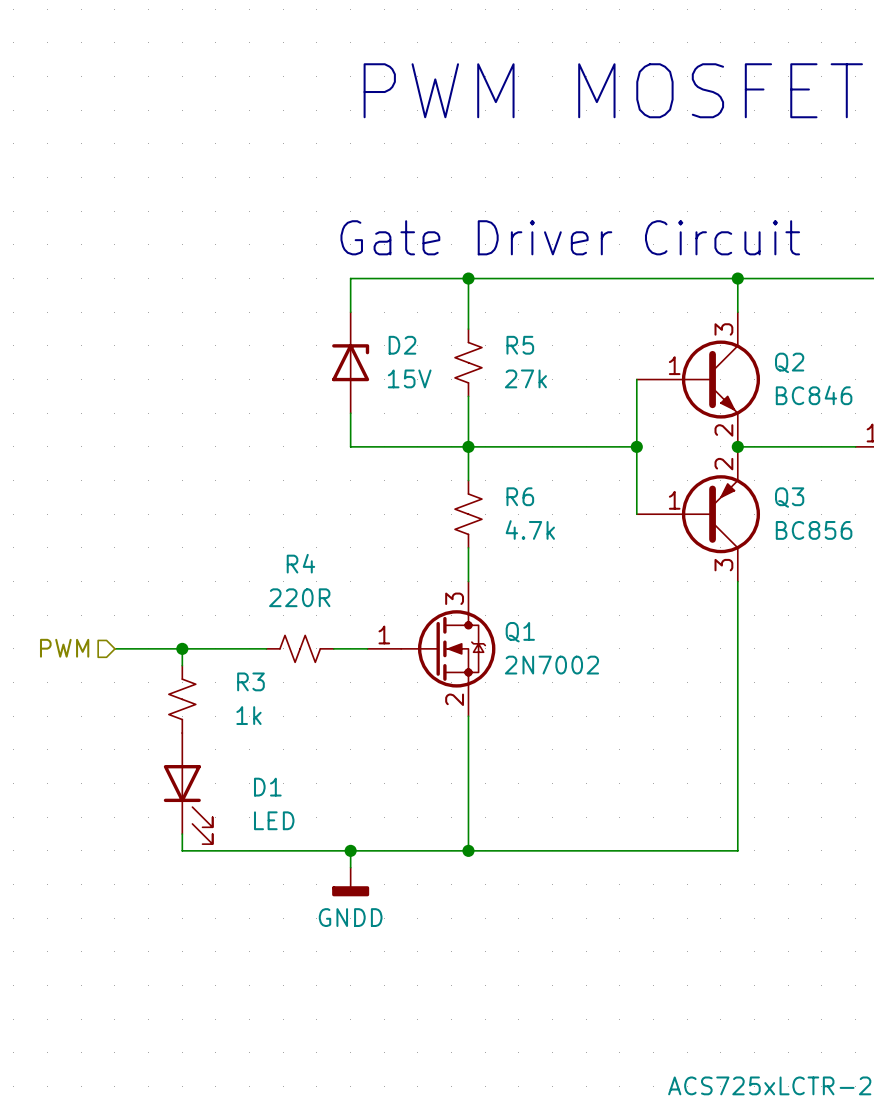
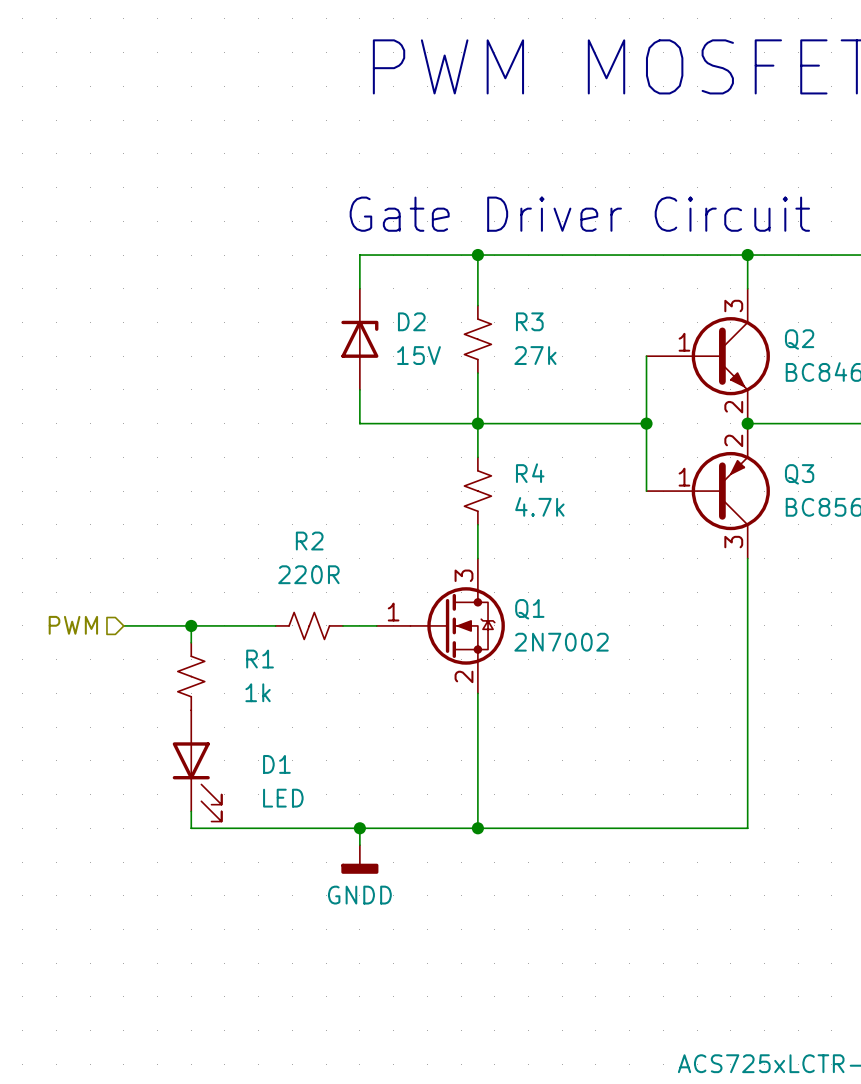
R5 name: R5 (520, 345) -> R3 (529, 321)
R6 name: R6 (520, 496) -> R4 (530, 473)
R4 name: R4 (300, 563) -> R2 (309, 541)
R3 name: R3 (250, 681) -> R1 (260, 659)

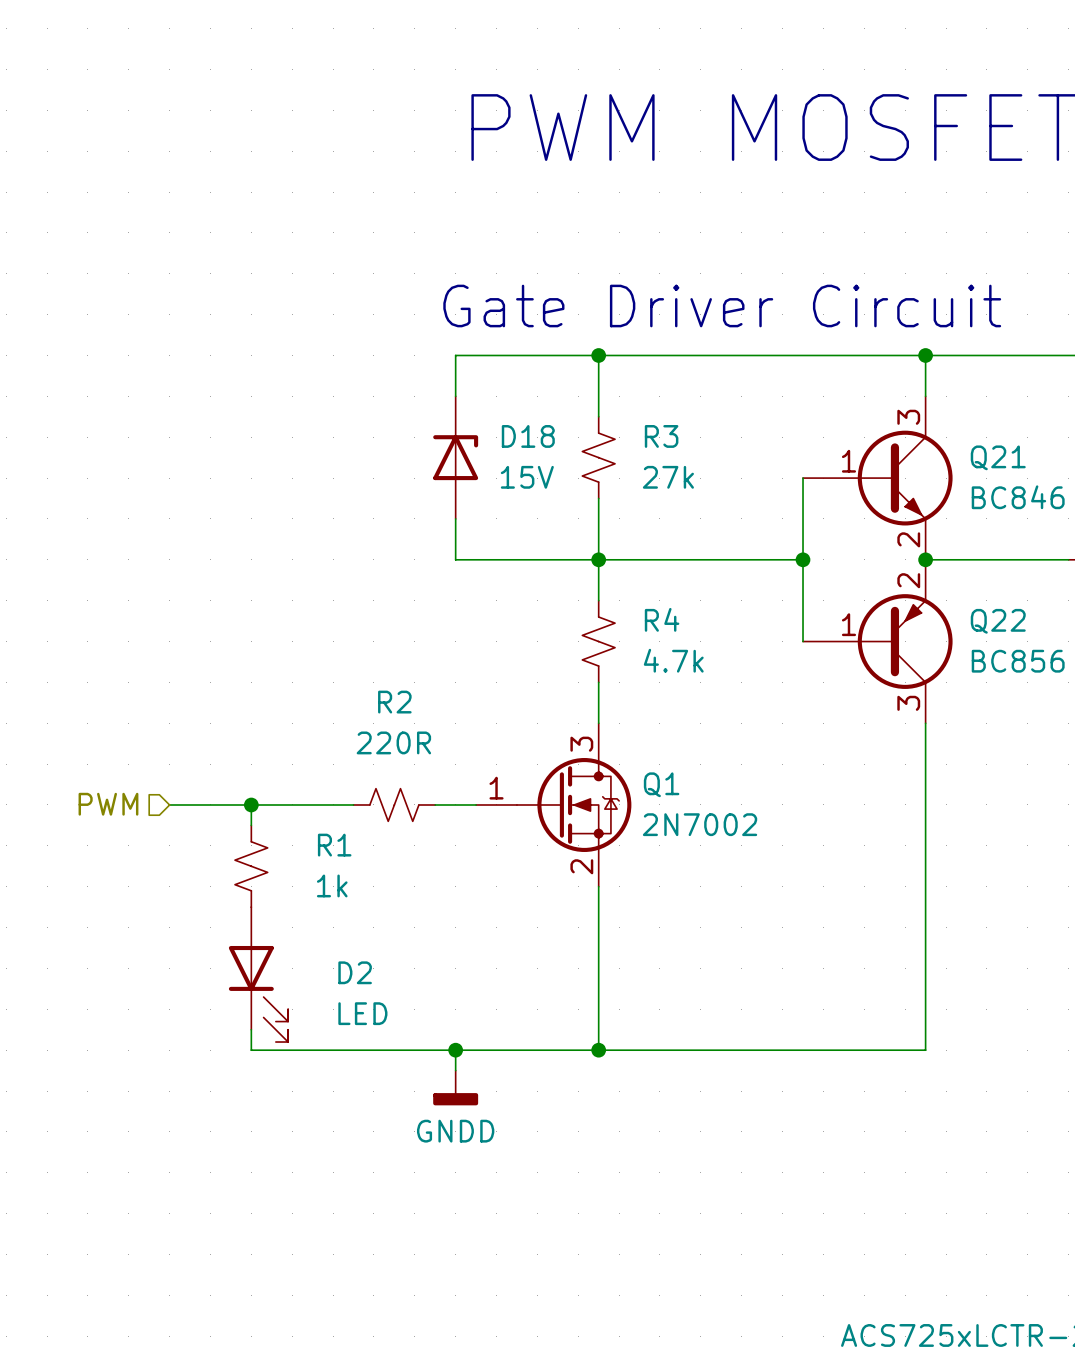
D2 name: D2 (411, 321) -> D18 (528, 436)
Q2 name: Q2 (799, 339) -> Q21 (998, 457)
Q3 name: Q3 (799, 474) -> Q22 (998, 621)
D1 name: D1 (276, 764) -> D2 (355, 972)

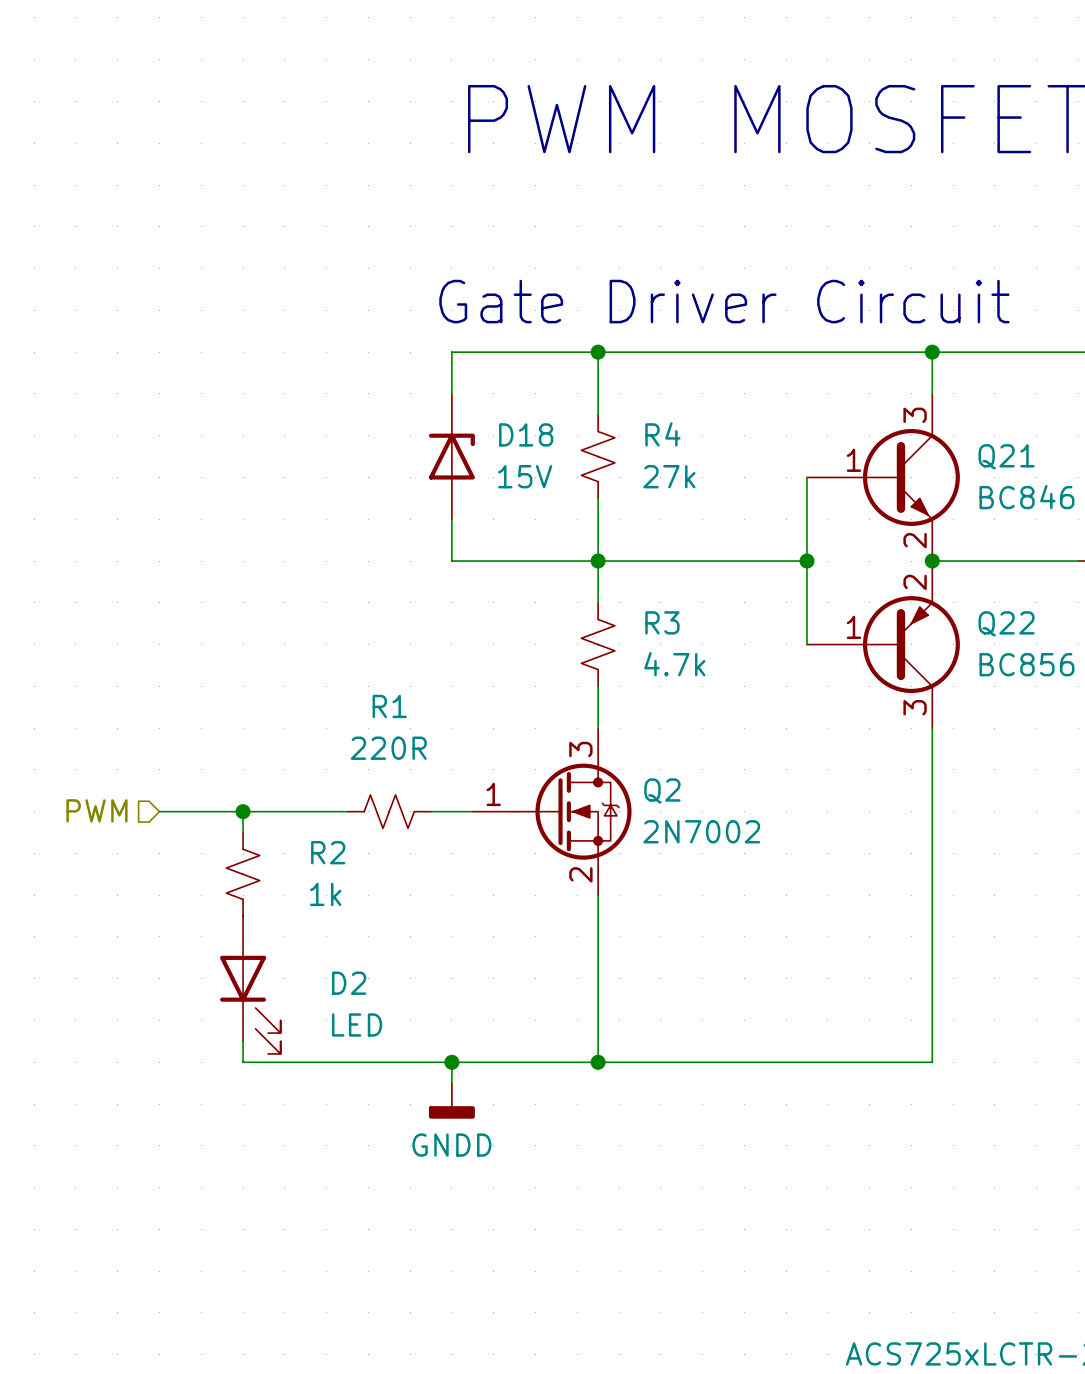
R3 name: R3 (661, 436) -> R4 (662, 434)
R4 name: R4 (662, 619) -> R3 (662, 622)
R2 name: R2 (394, 702) -> R1 (389, 706)
Q1 name: Q1 (661, 784) -> Q2 (662, 790)
R1 name: R1 (334, 845) -> R2 (328, 852)

